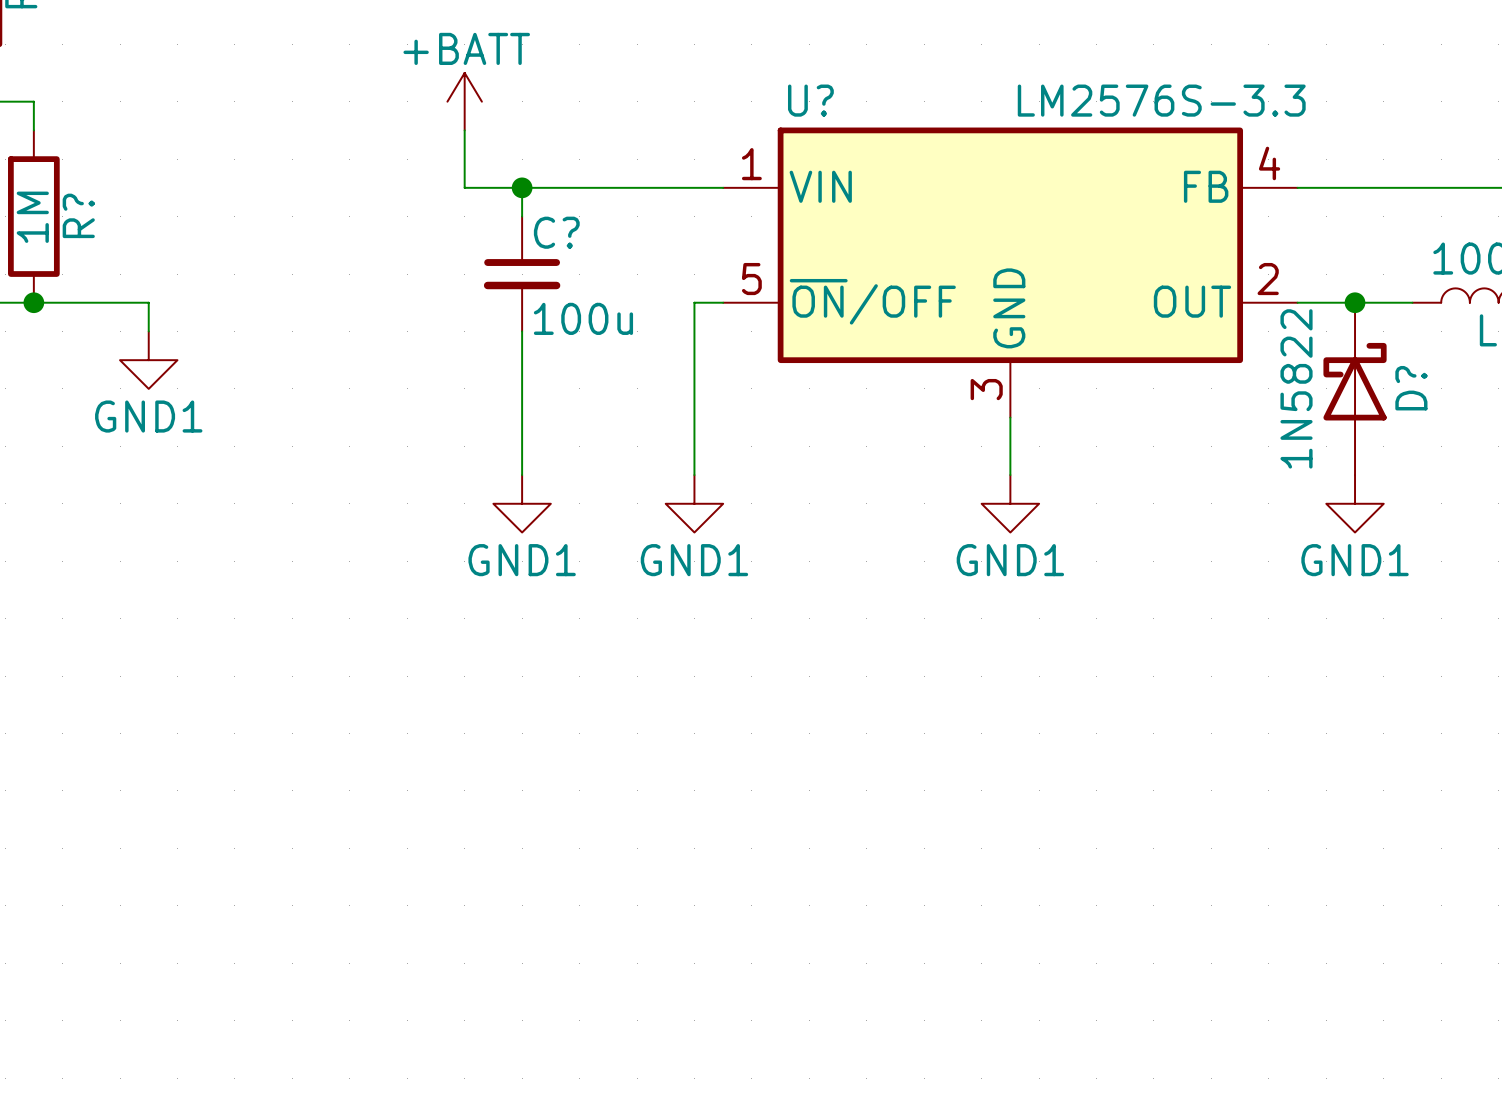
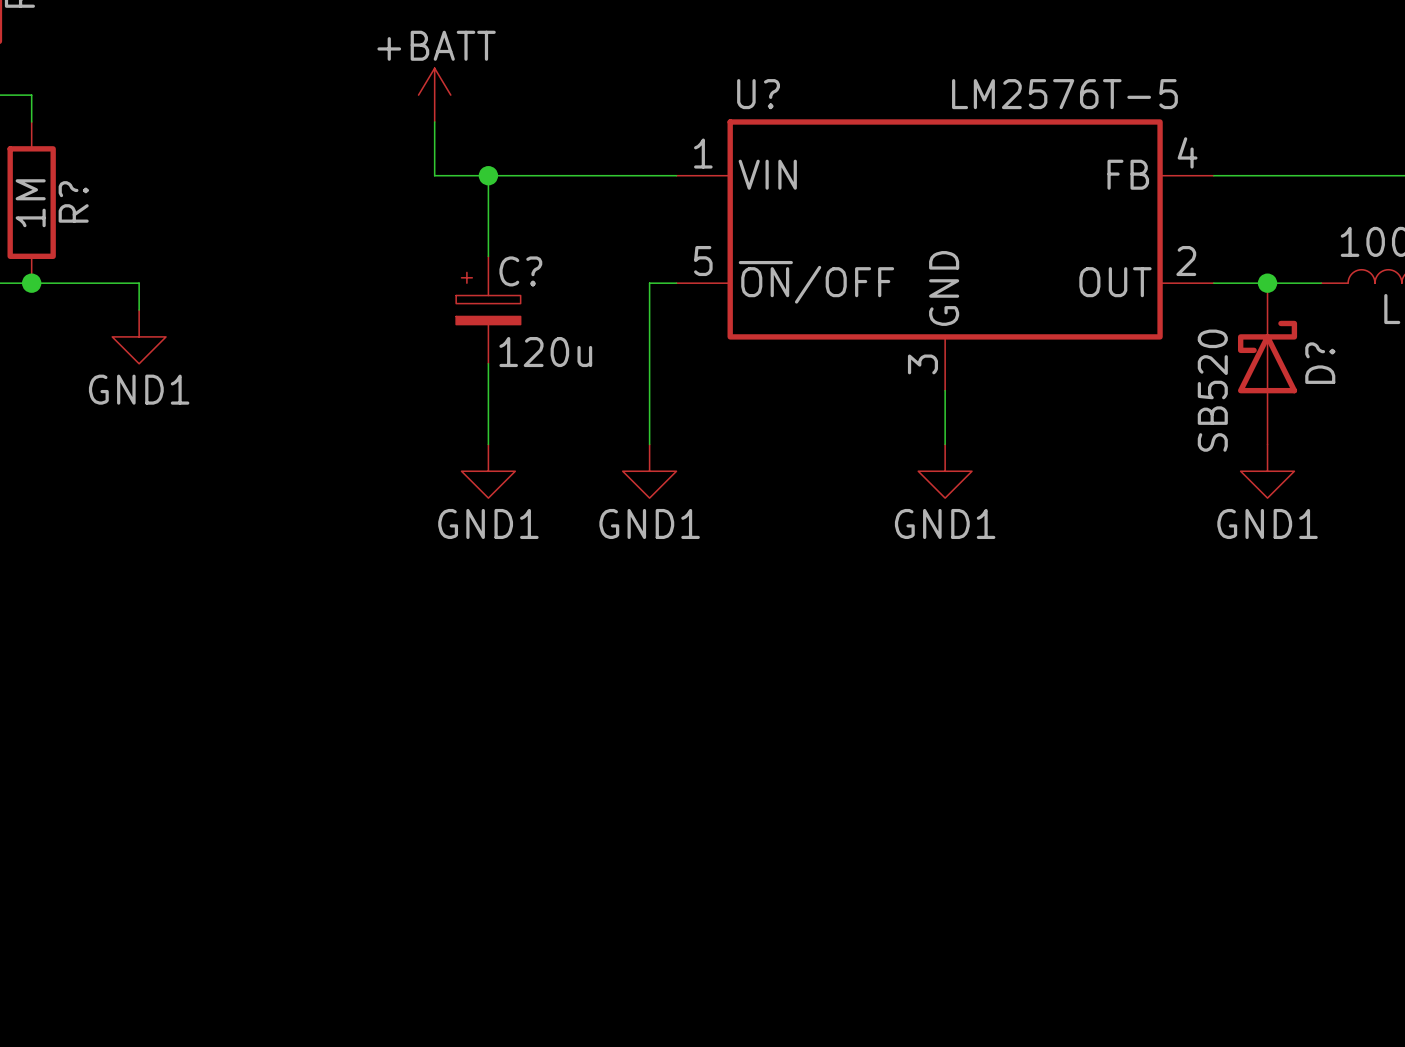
U? value: LM2576S-3.3 (1161, 100) -> LM2576T-5 (1064, 94)
C?: 100u (522, 274) -> none
C?: none -> 120u (488, 310)
D? value: 1N5822 (1296, 388) -> SB520 (1212, 390)

